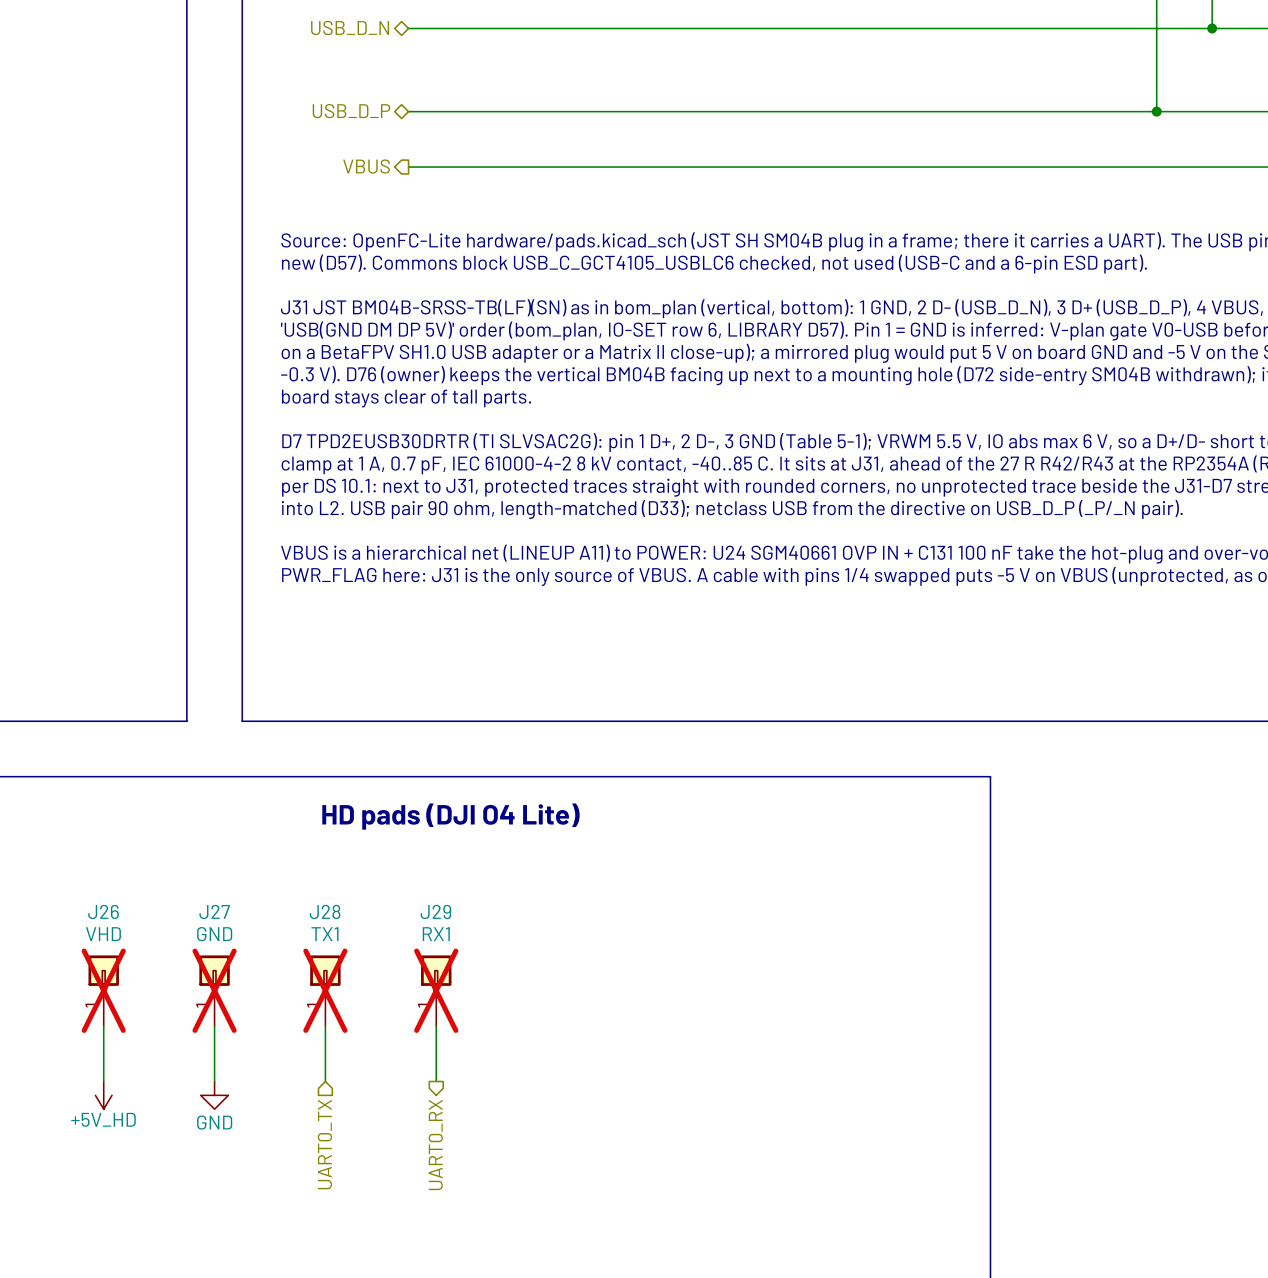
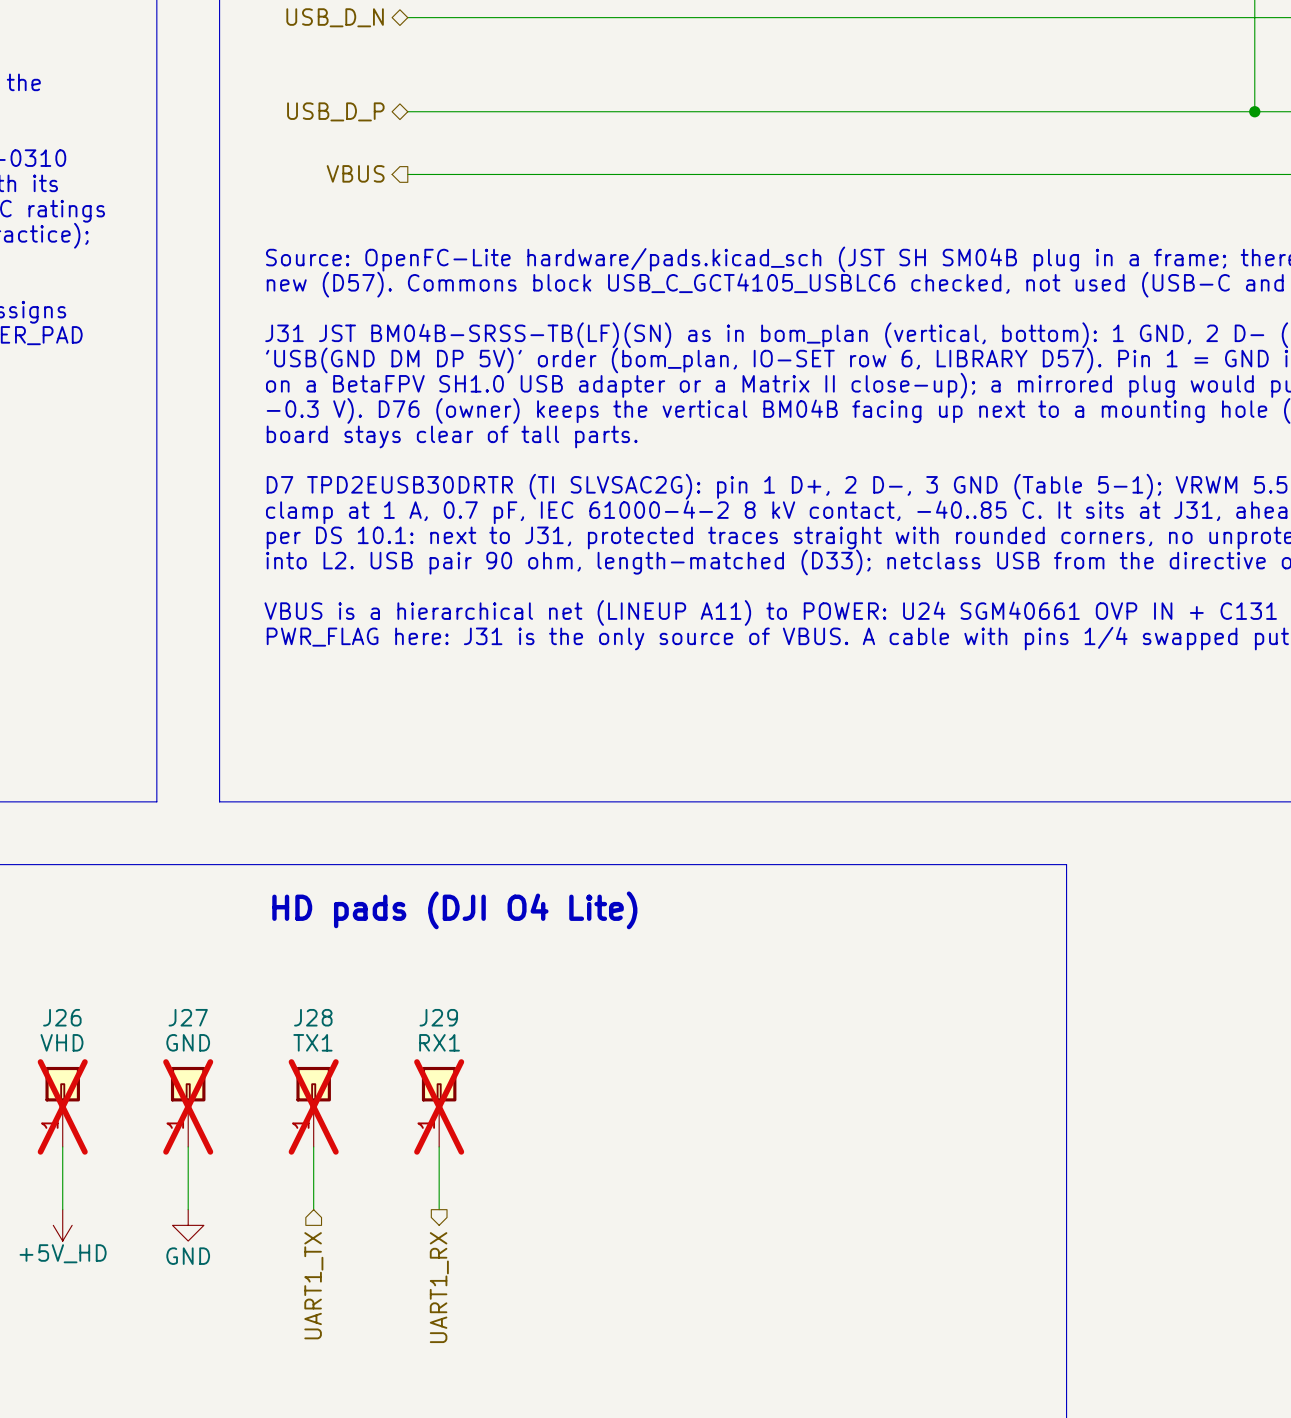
hierarchical label: UART0_TX (324, 1144) -> UART1_TX (313, 1285)
hierarchical label: UART0_RX (435, 1144) -> UART1_RX (439, 1287)

